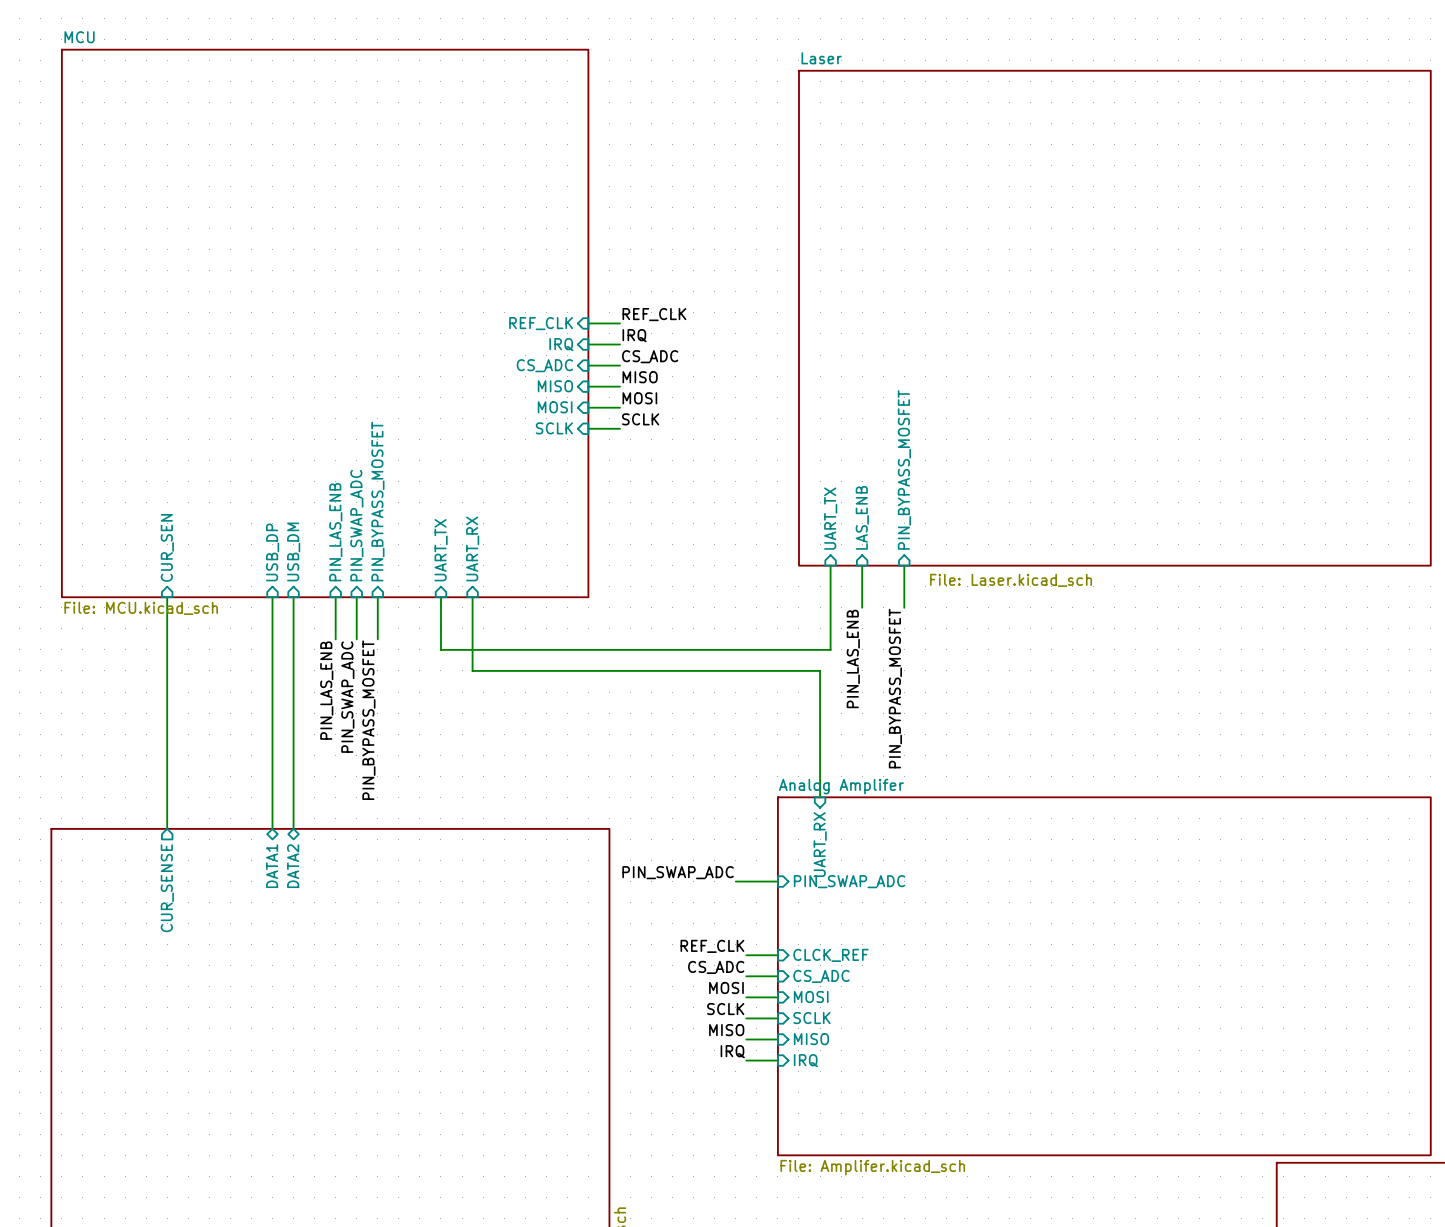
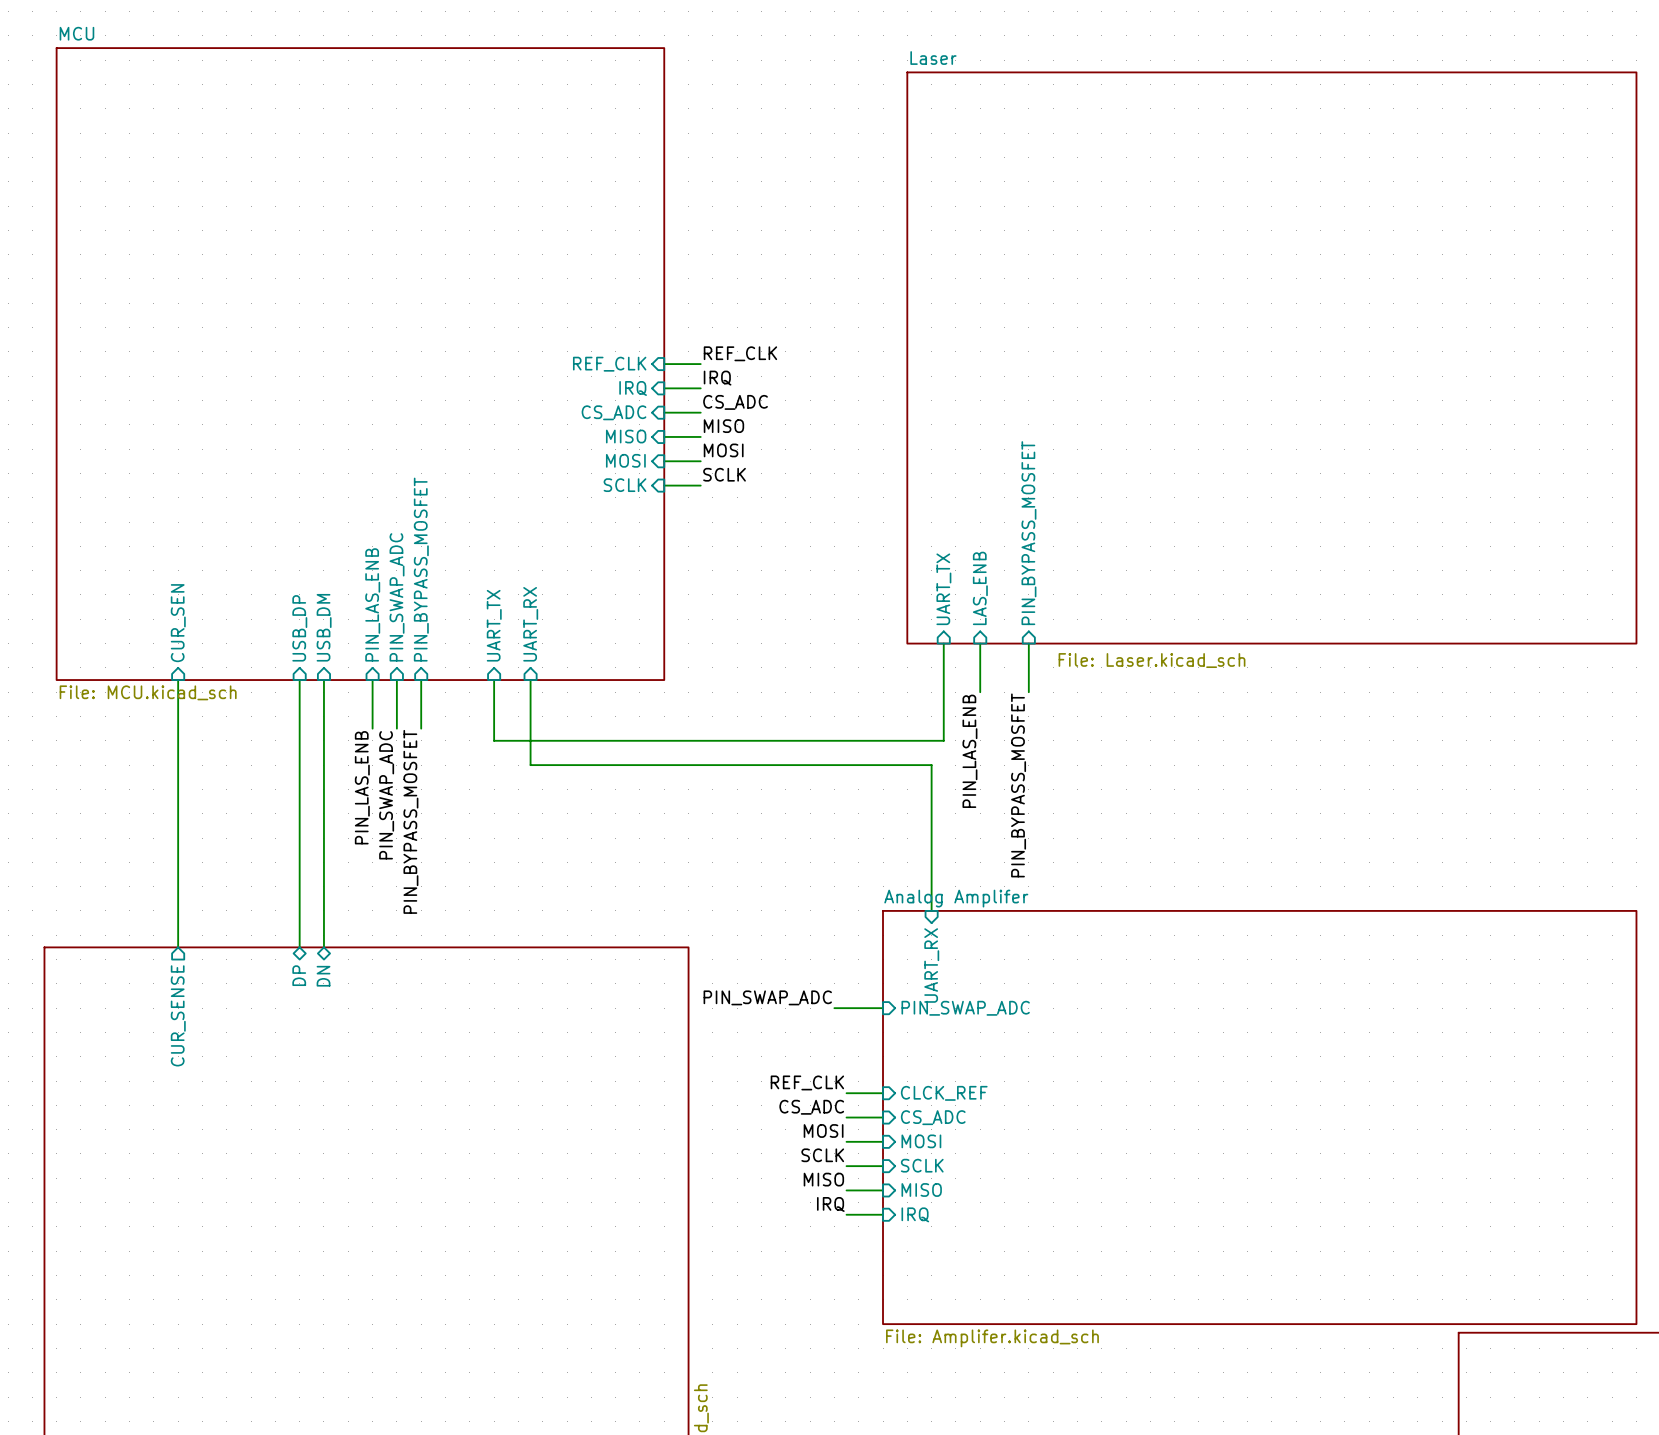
sheet pin: DATA1 (272, 866) -> DP (299, 975)
sheet pin: DATA2 (293, 866) -> DN (323, 976)

